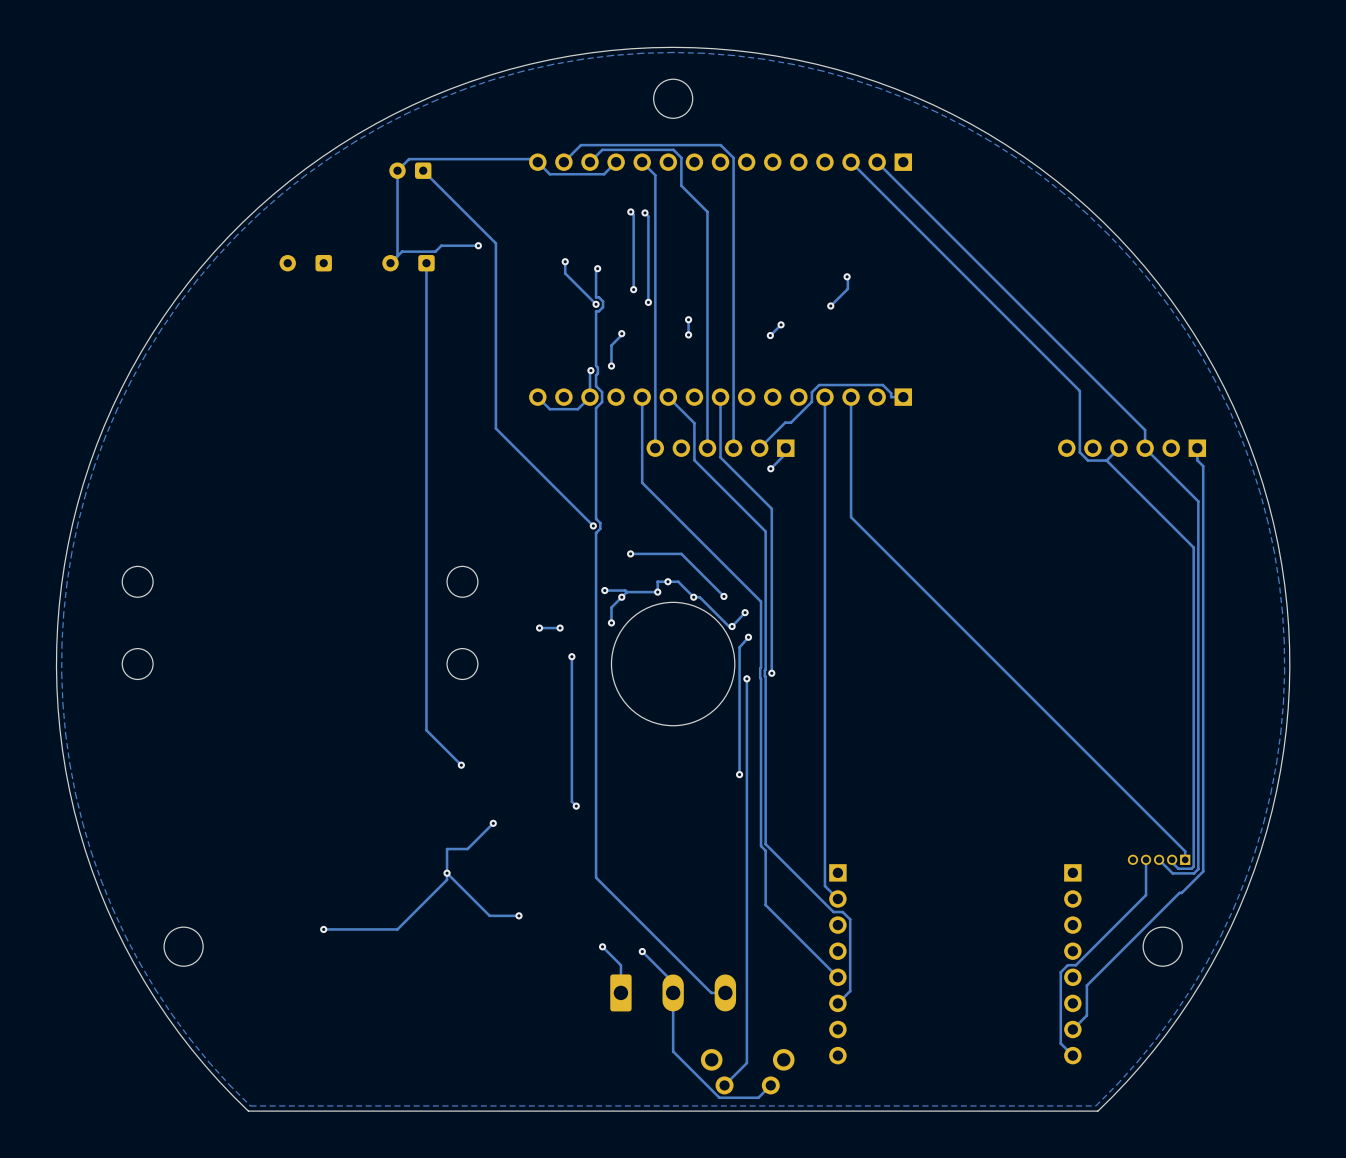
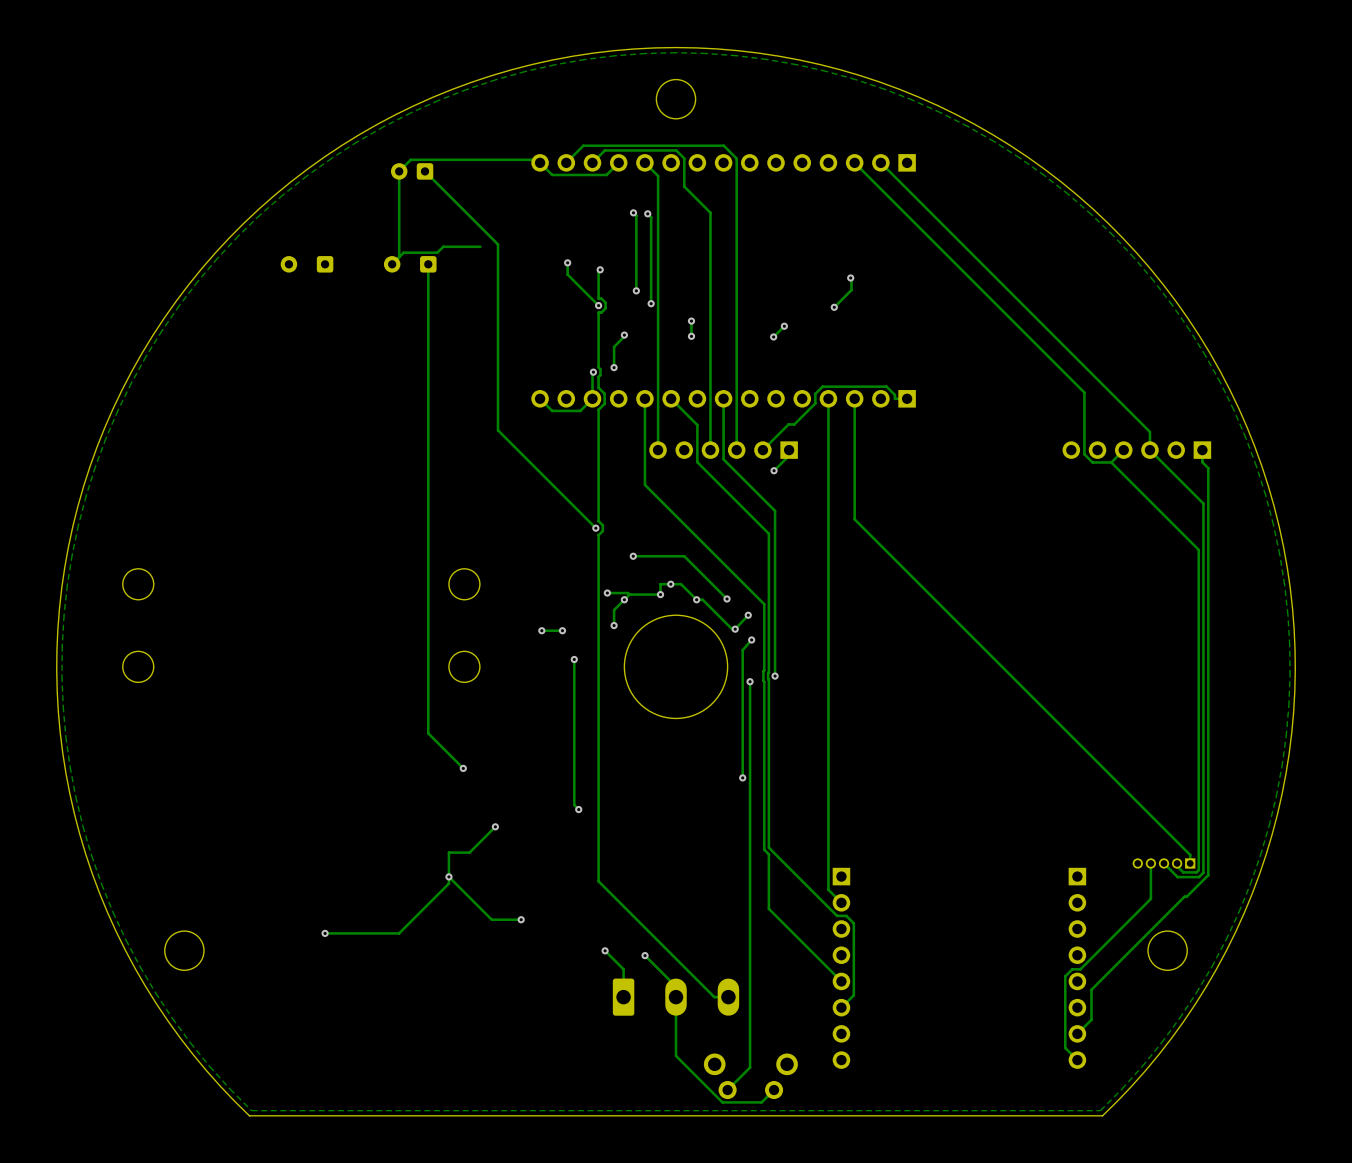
via: (478, 245) -> none
round board edge size: [610, 601, 736, 727] -> [623, 614, 729, 719]

